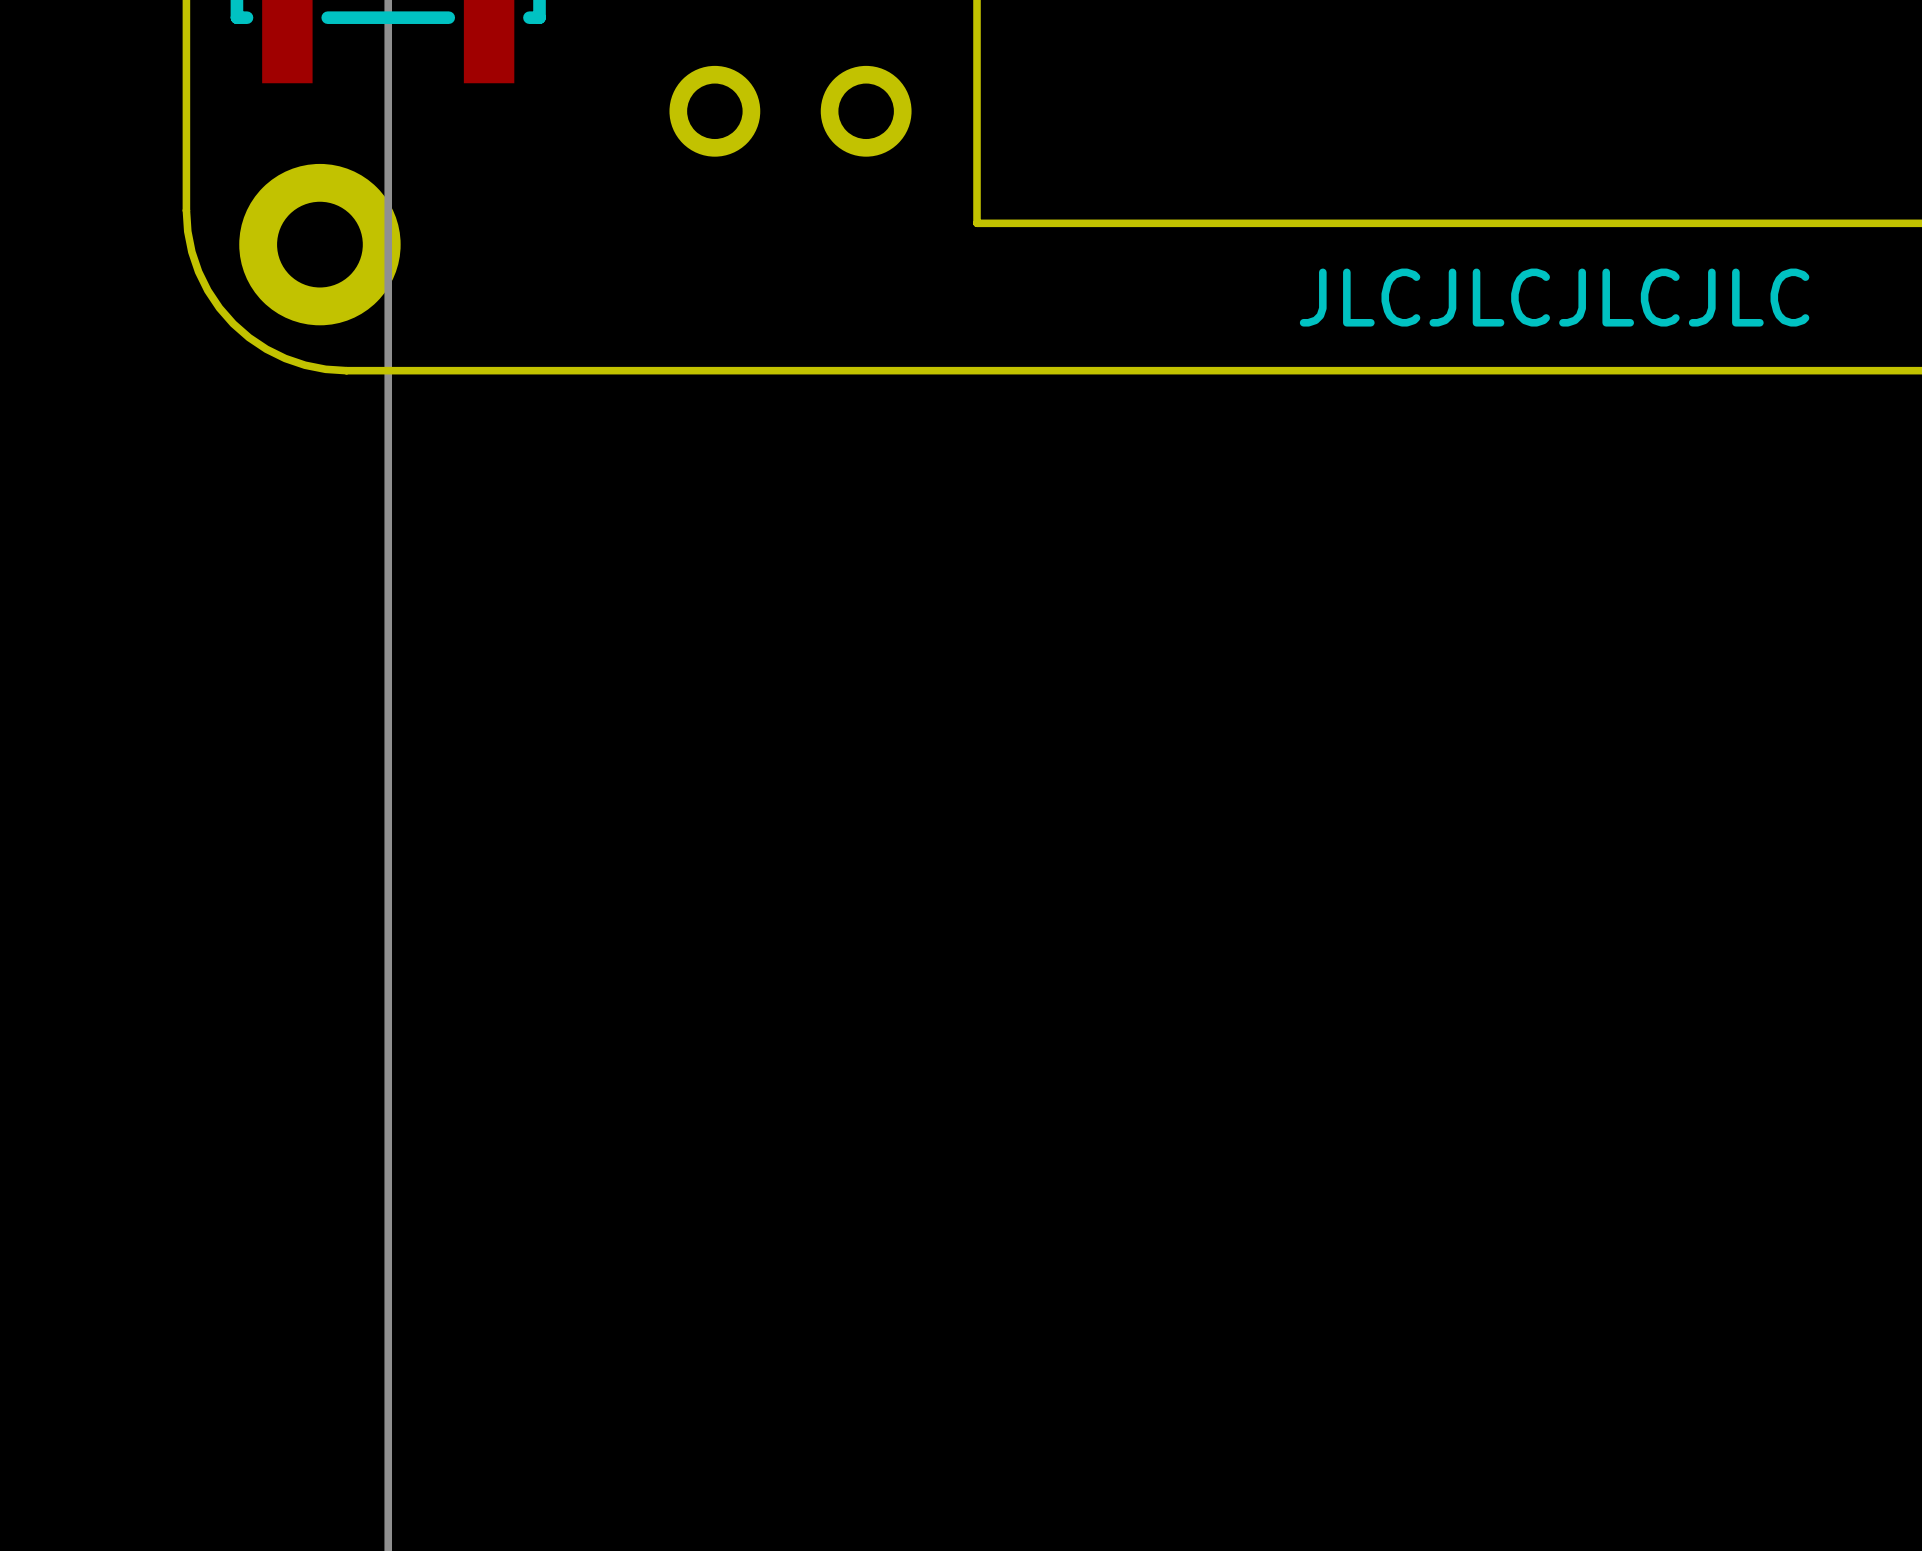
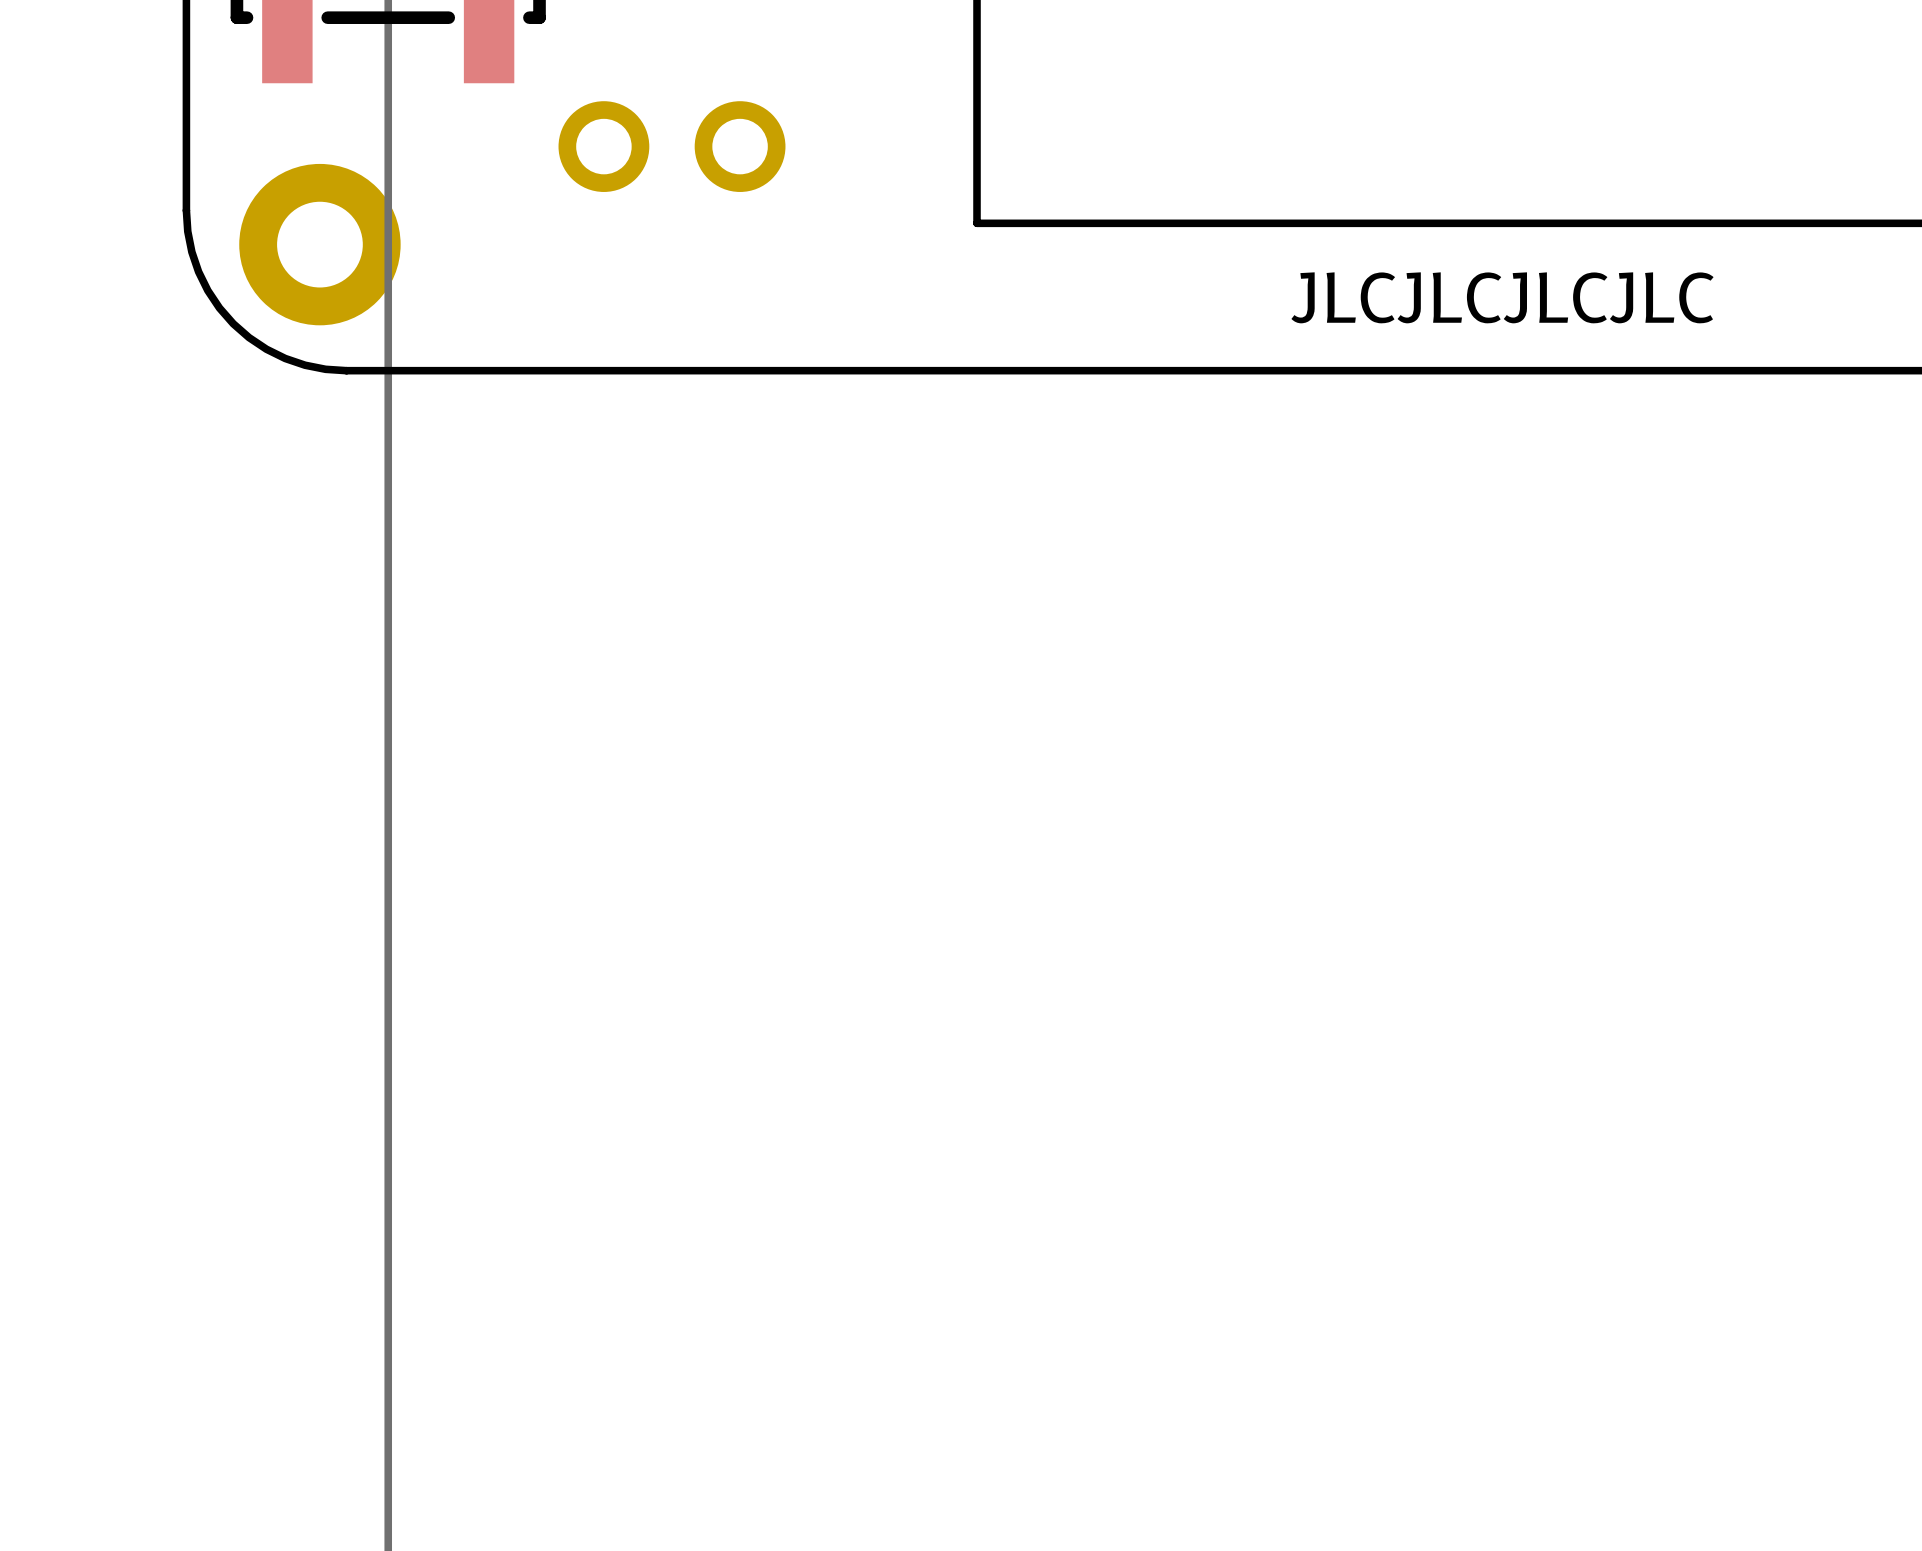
part position: (714, 111) -> (740, 146)
part position: (866, 111) -> (603, 146)

